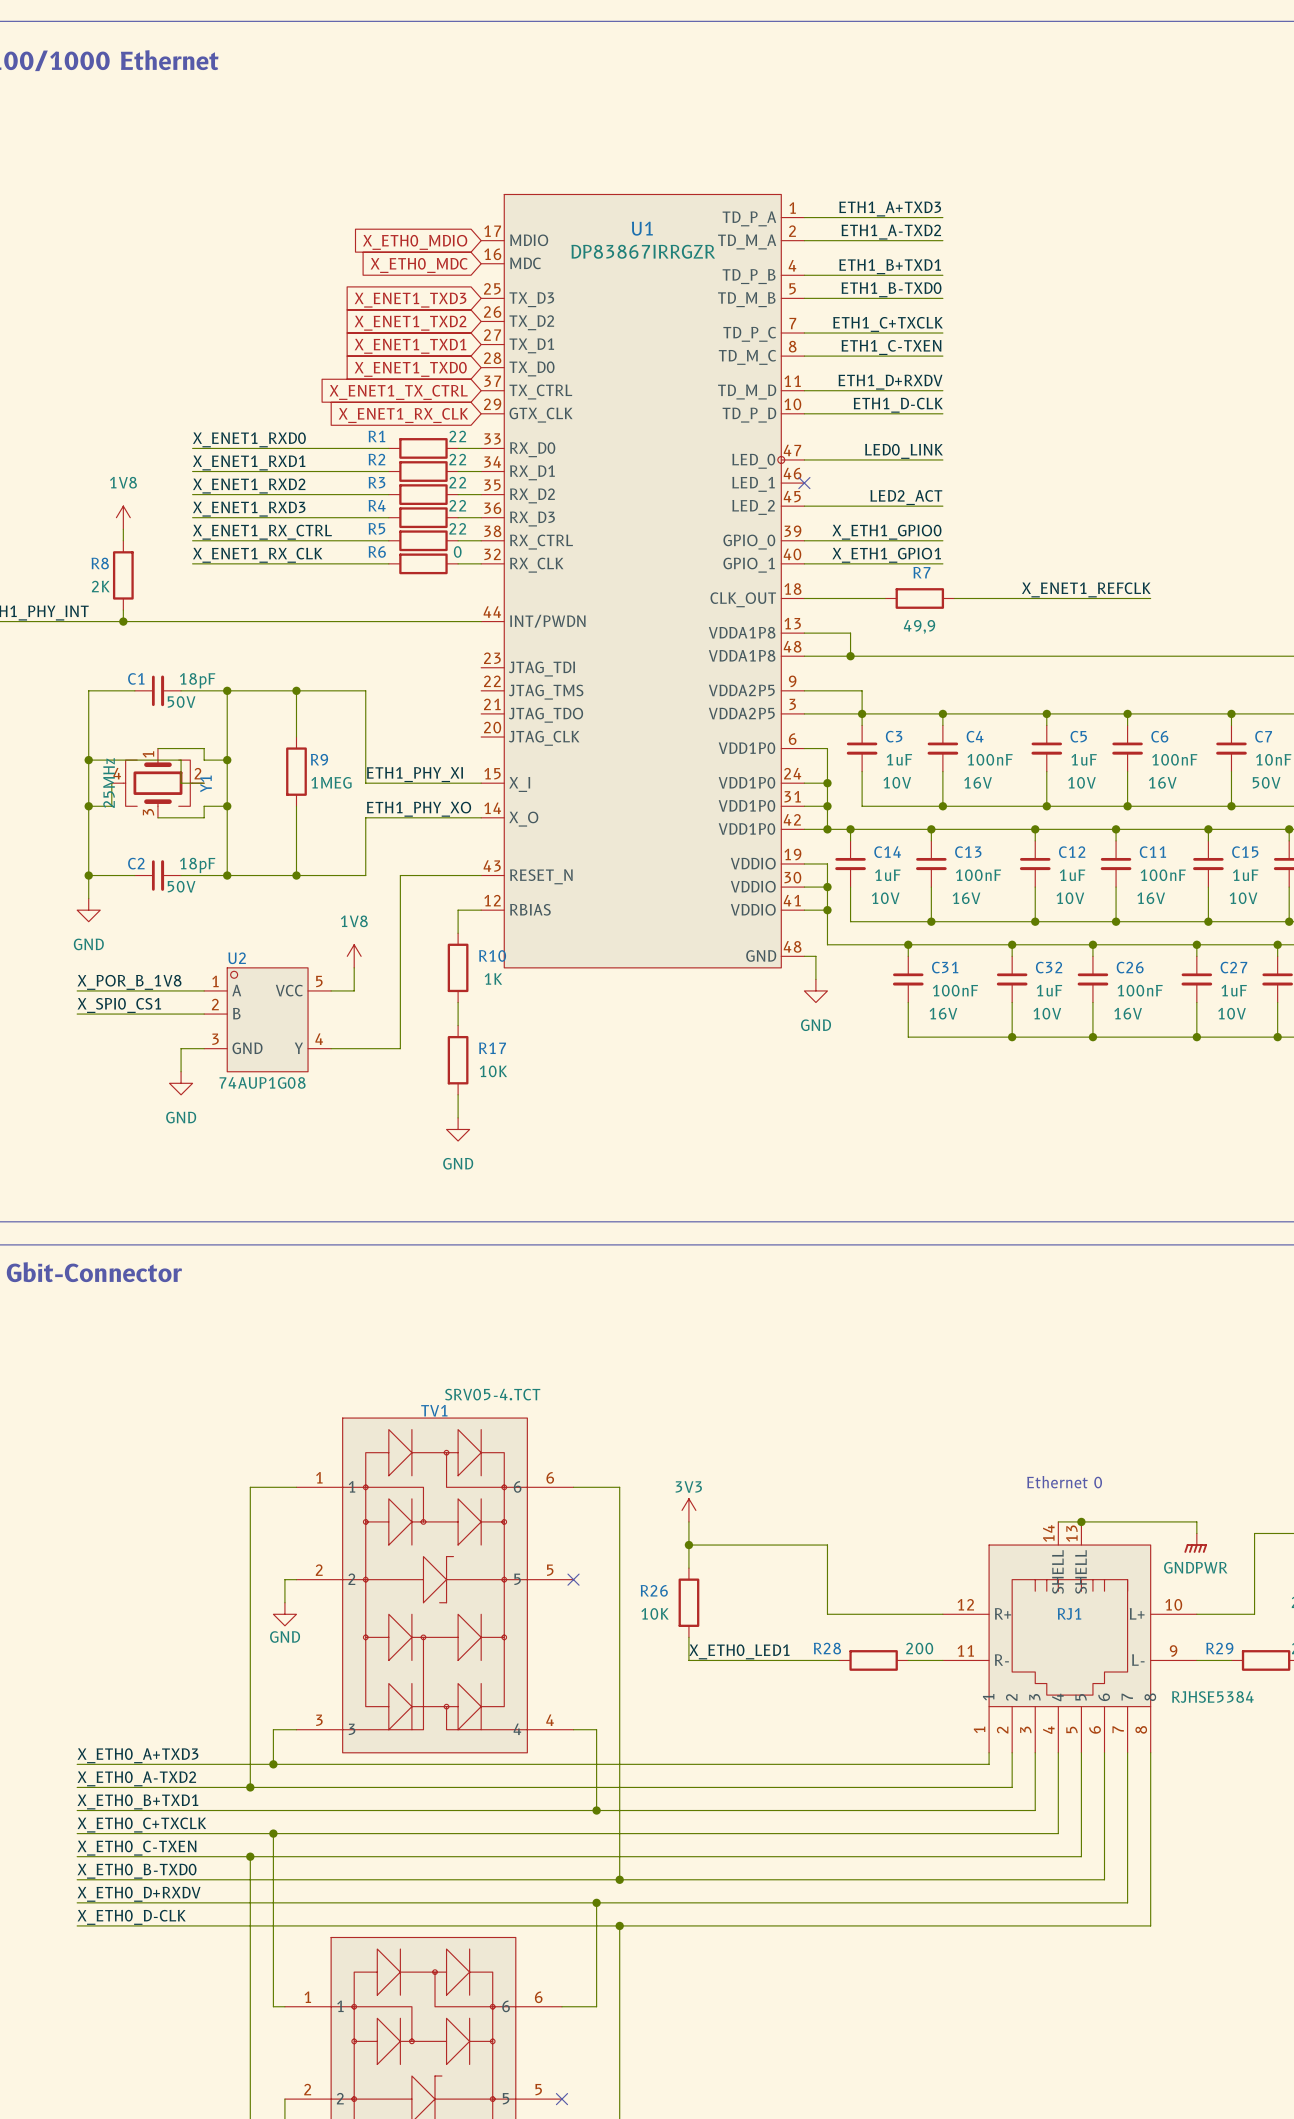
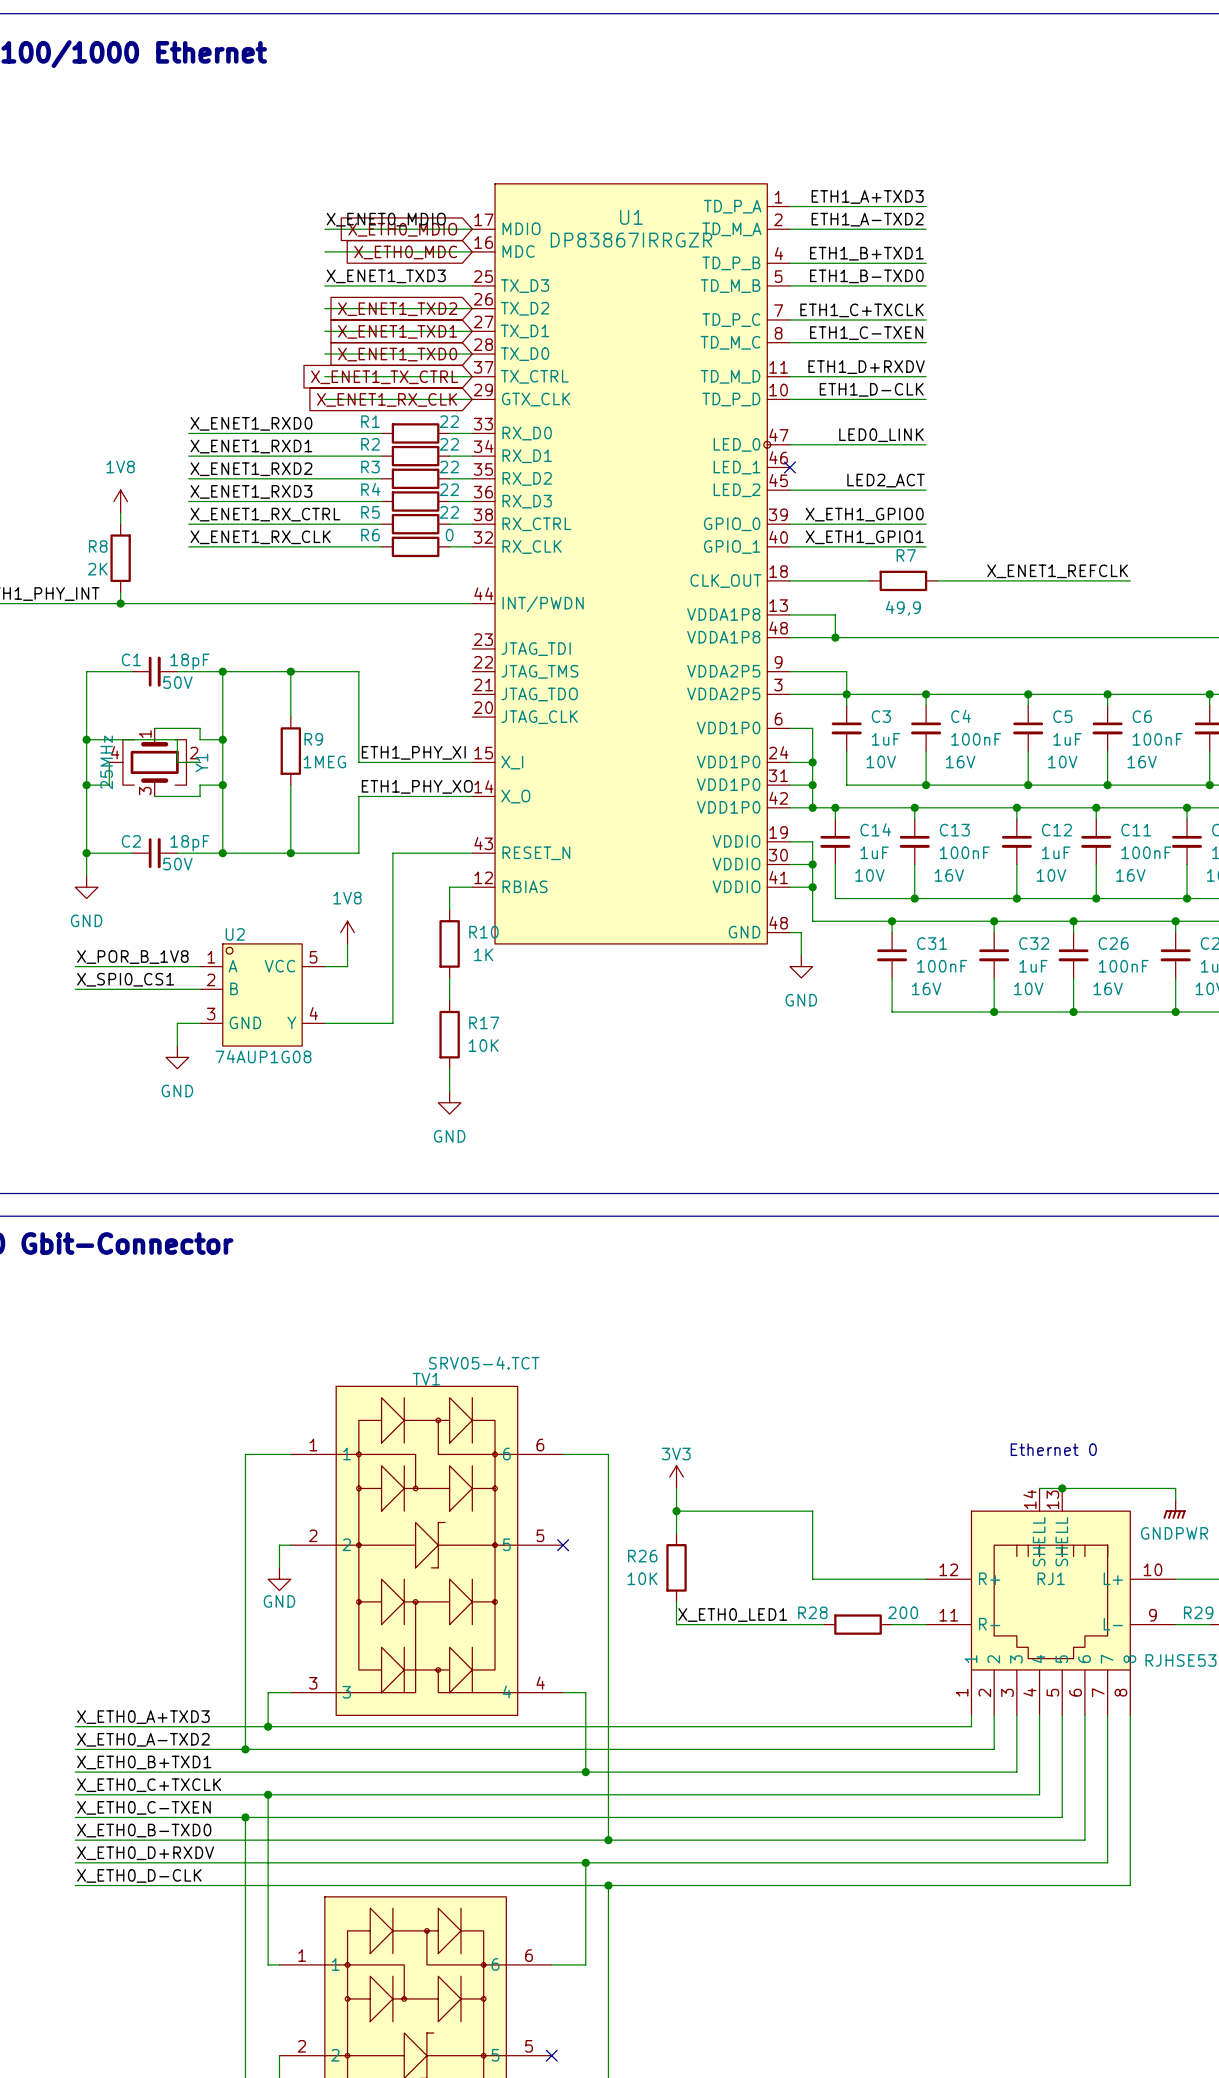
label: none -> X_ENET0_MDIO (386, 219)
wire: none -> (324, 229) (472, 229)
wire: none -> (324, 251) (472, 251)
label: none -> X_ENET1_TXD3 (386, 276)
wire: none -> (324, 285) (472, 285)
global label: X_ENET1_TXD3 (410, 300) -> none
wire: none -> (324, 308) (472, 308)
wire: none -> (324, 331) (472, 331)
wire: none -> (324, 354) (472, 354)
wire: none -> (324, 376) (472, 376)
wire: none -> (324, 399) (472, 399)

